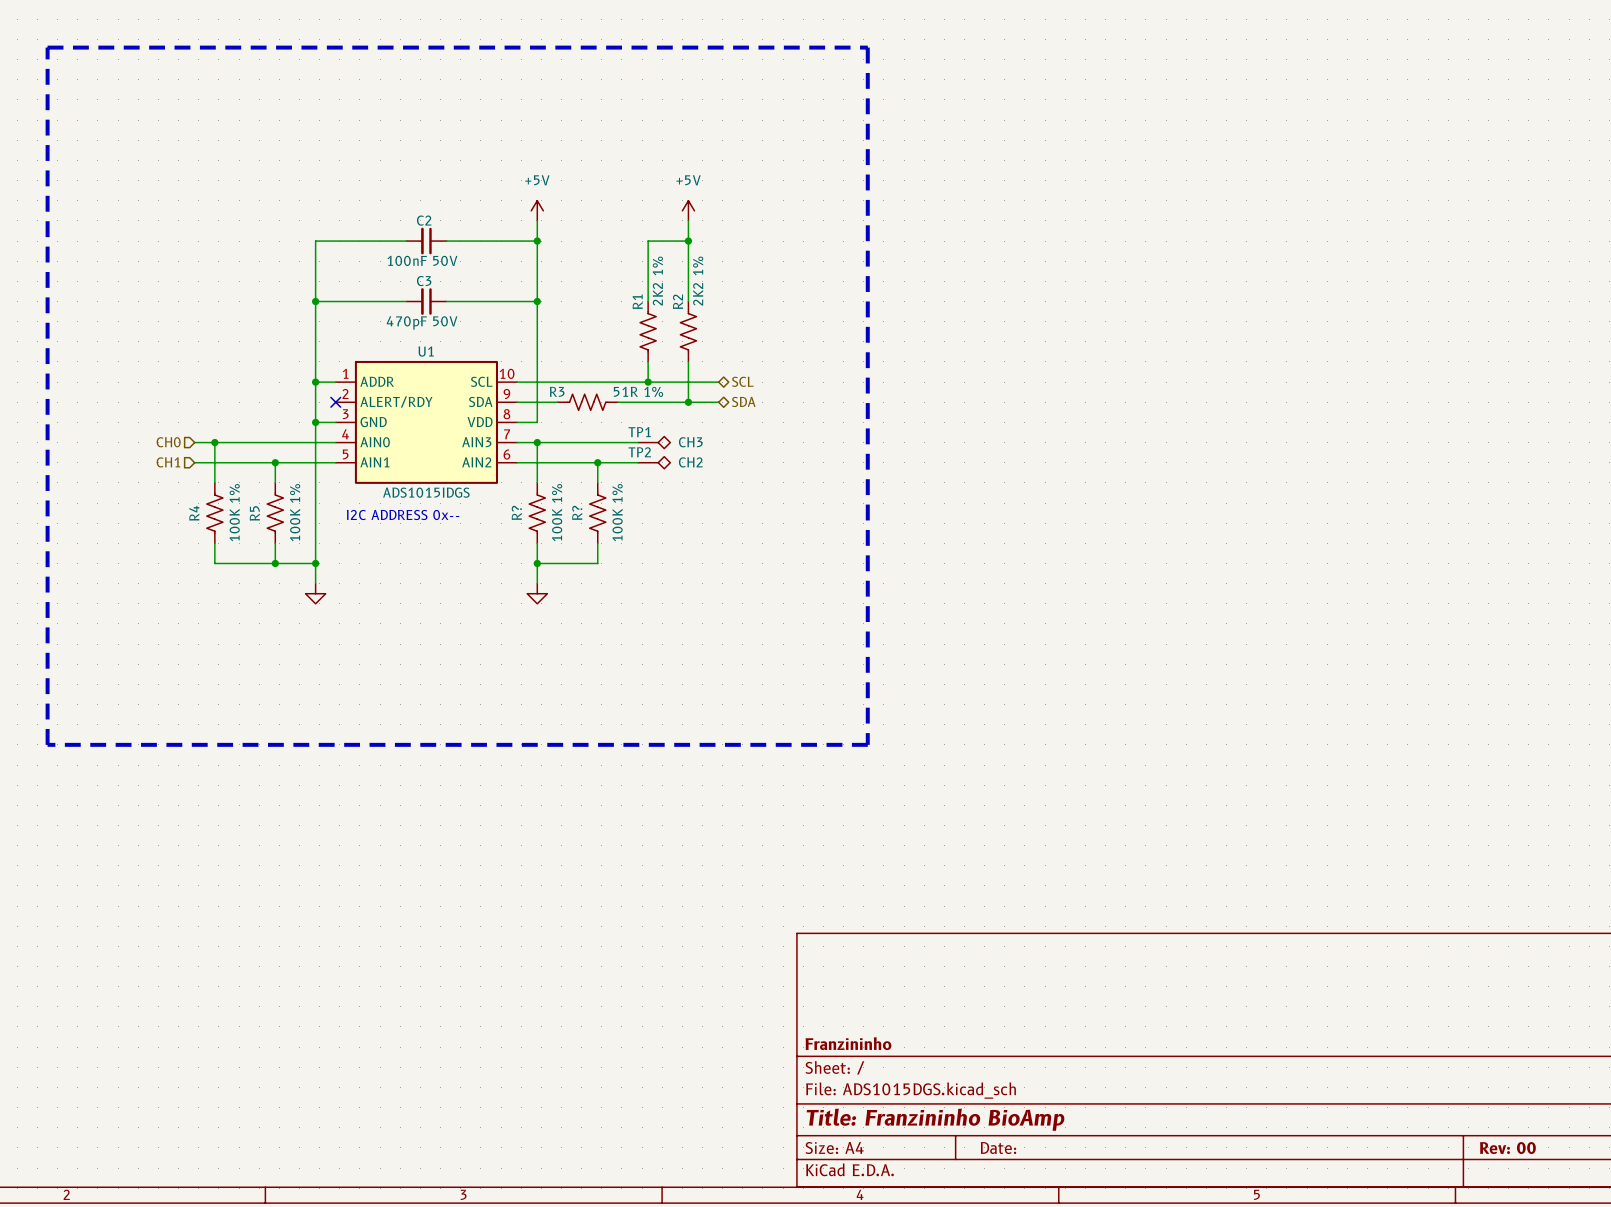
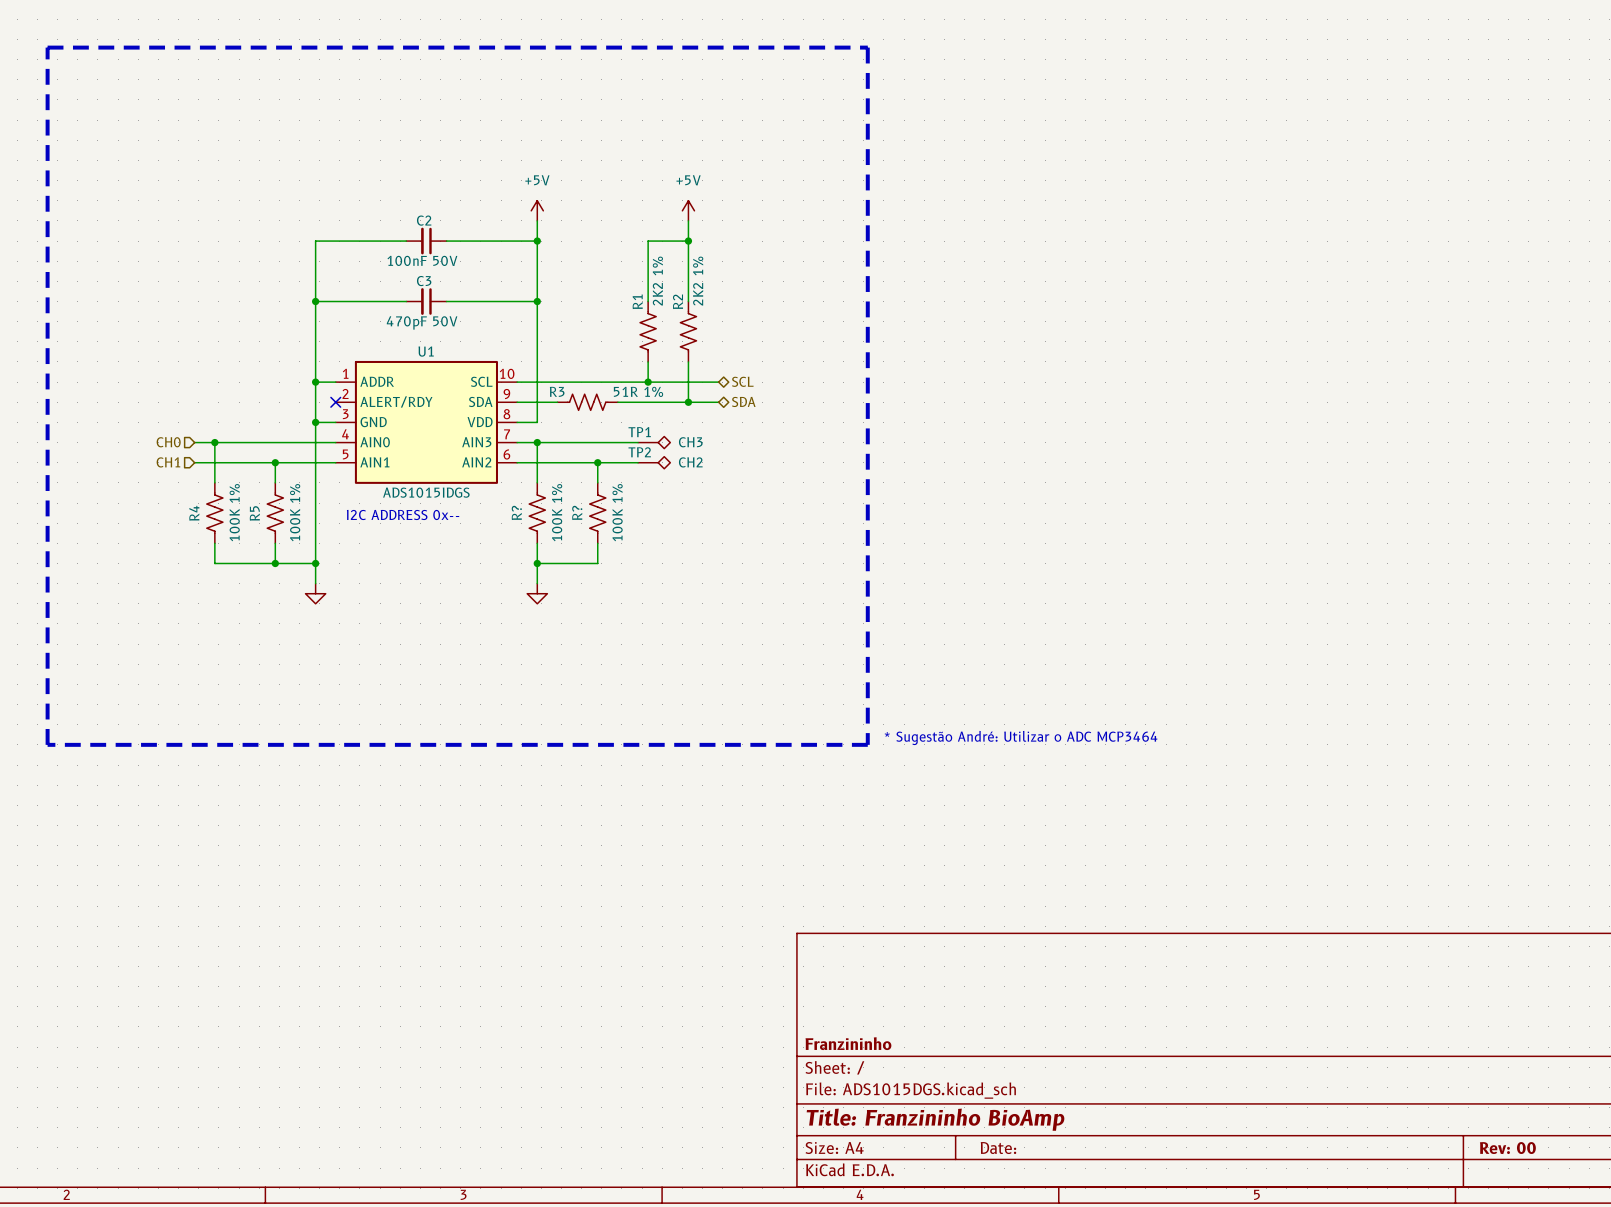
text: none -> * Sugestão André: Utilizar o ADC MCP3464 (1021, 737)

